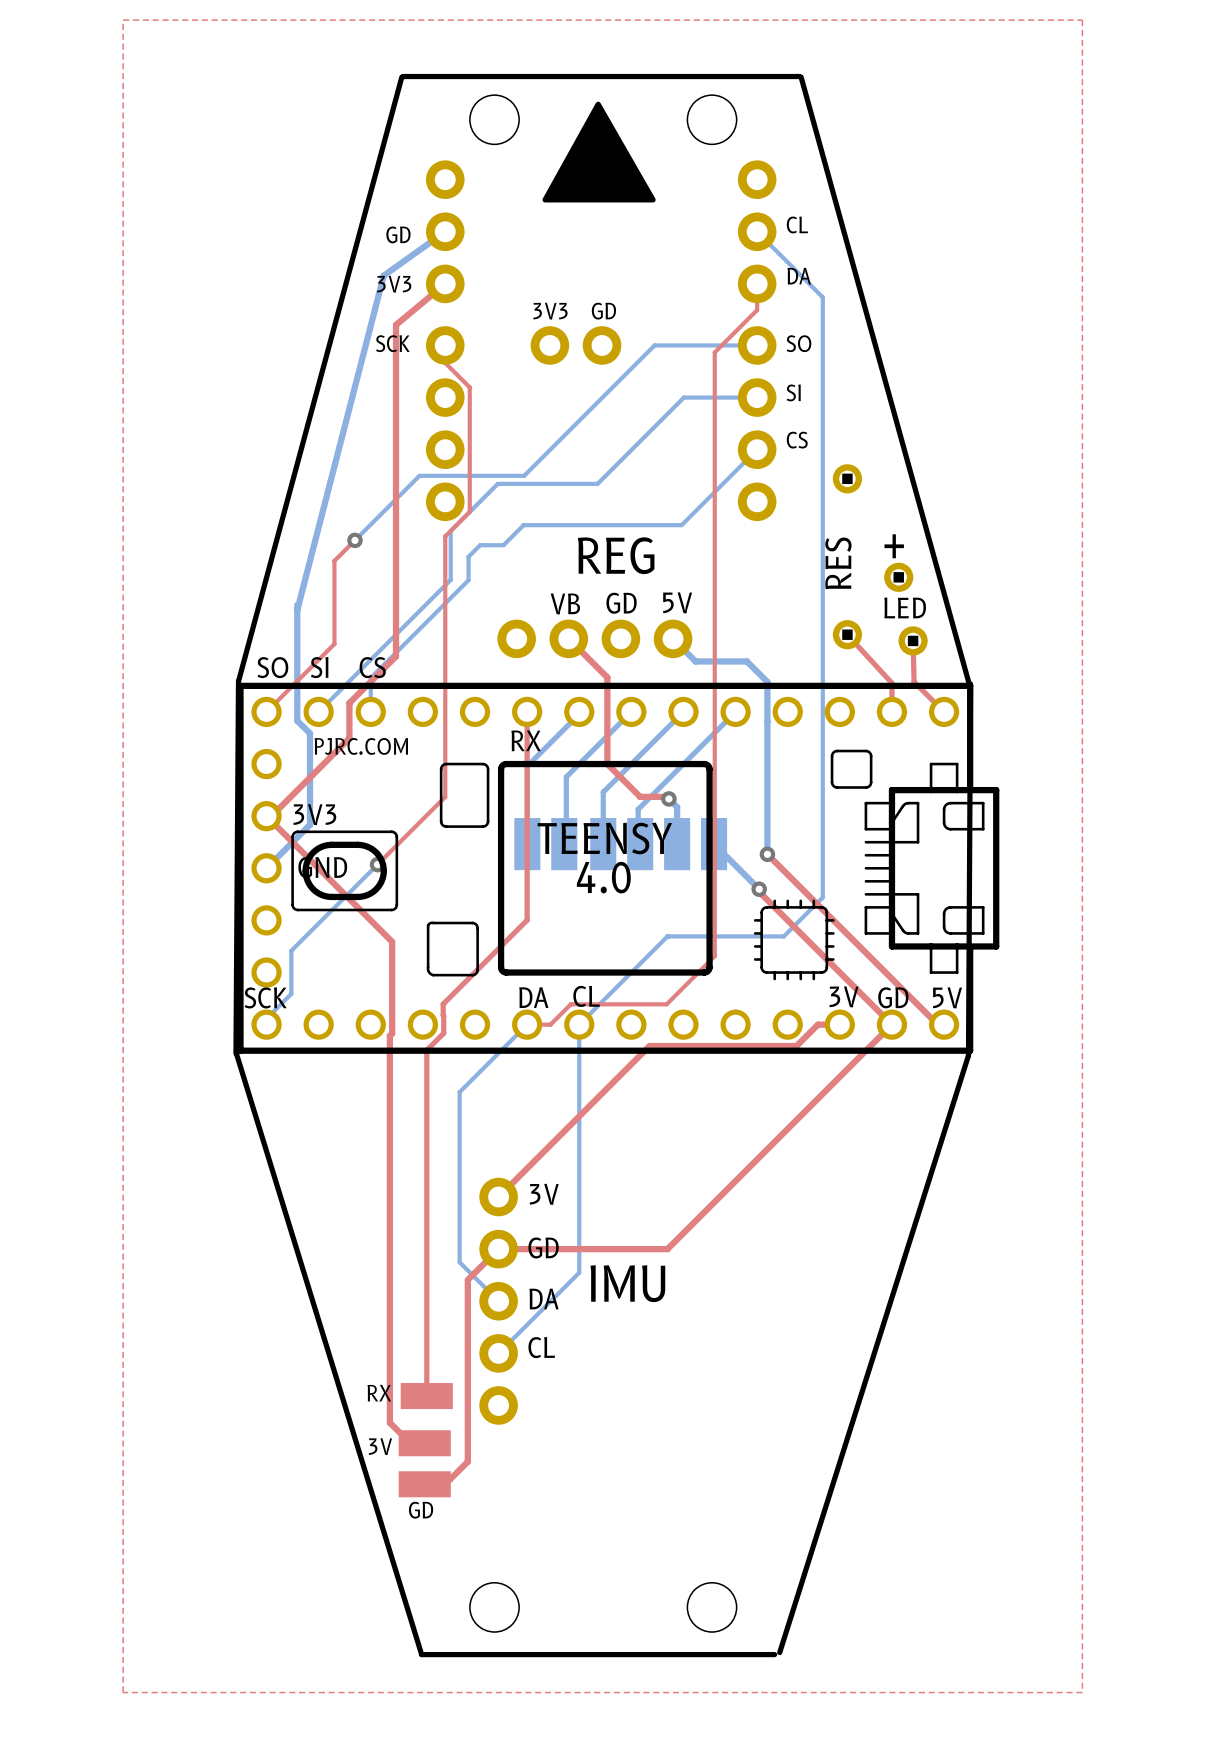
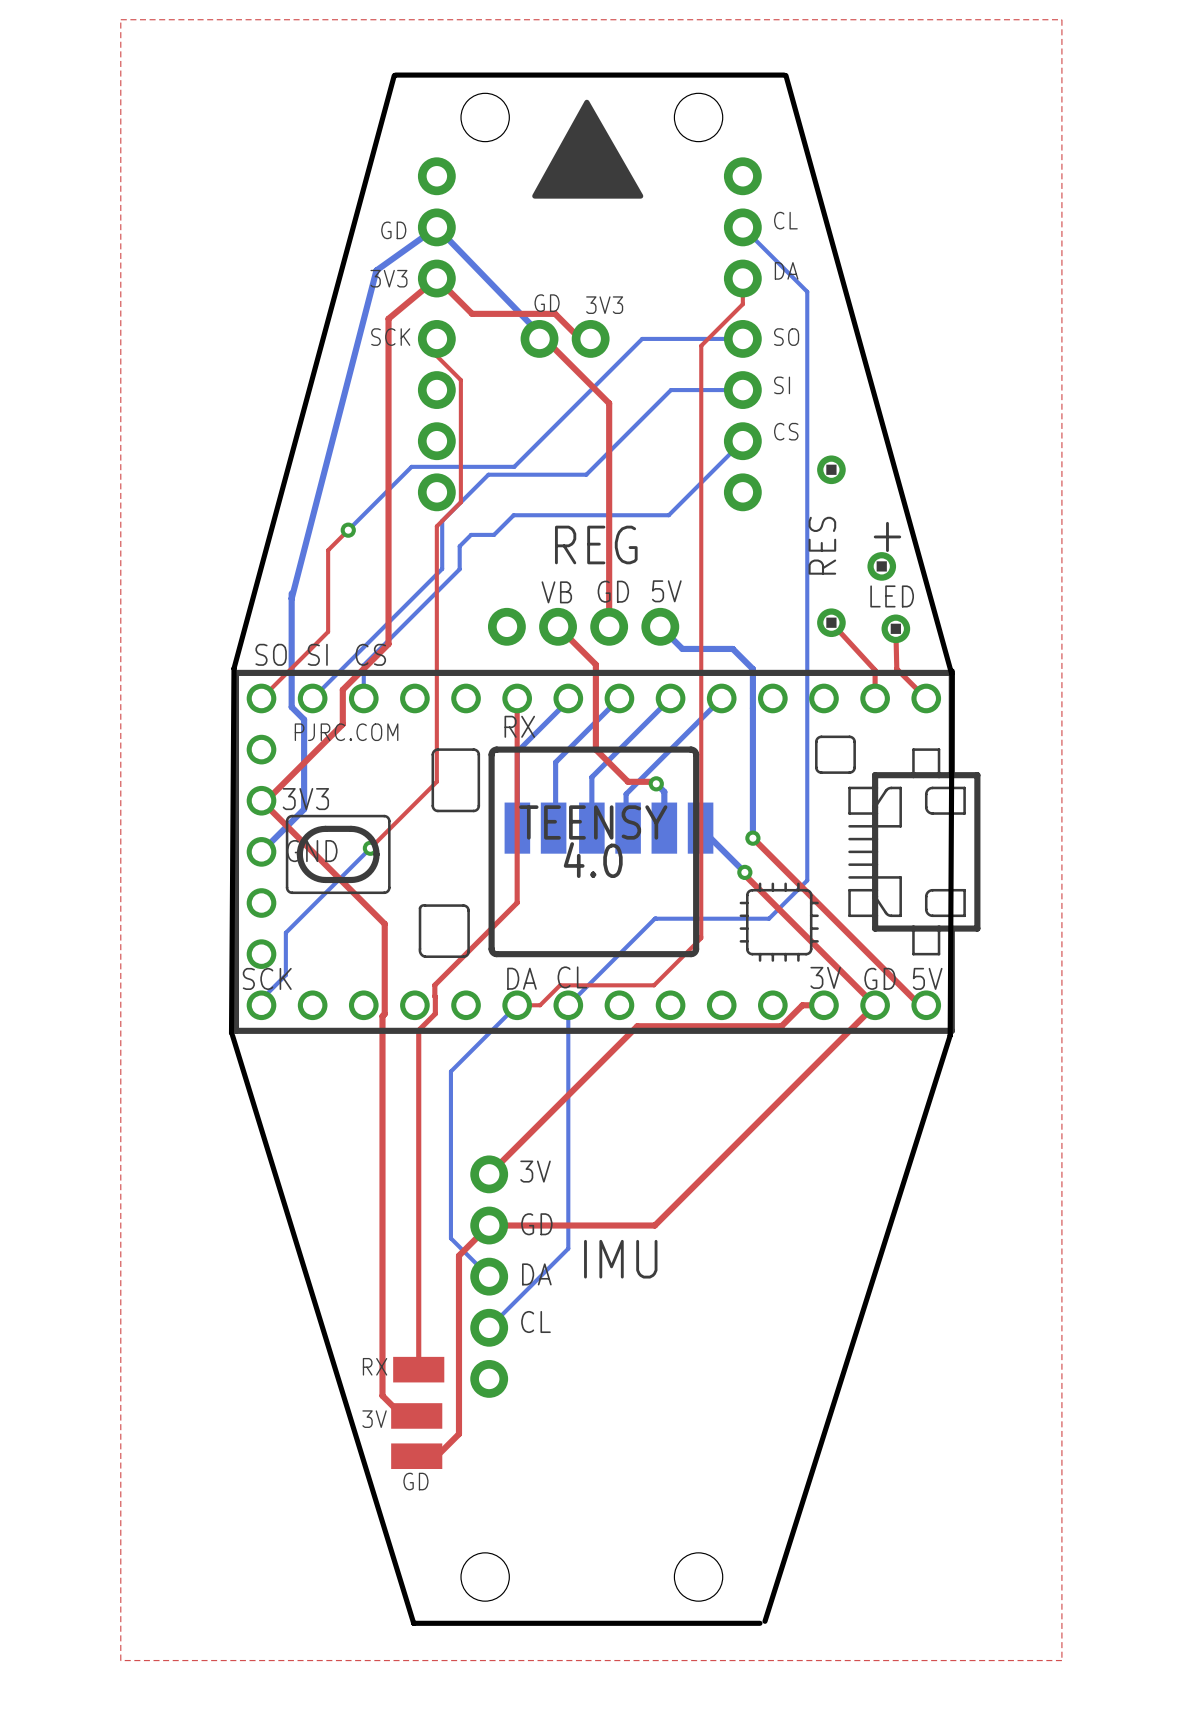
bottom track: none -> (436, 227) (544, 338)
top track: none -> (436, 278) (472, 313) (555, 313) (580, 338) (595, 338)
text: 3V3 (550, 311) -> GD (547, 303)
text: GD (603, 311) -> 3V3 (604, 305)
top track: none -> (544, 338) (609, 403) (609, 626)

